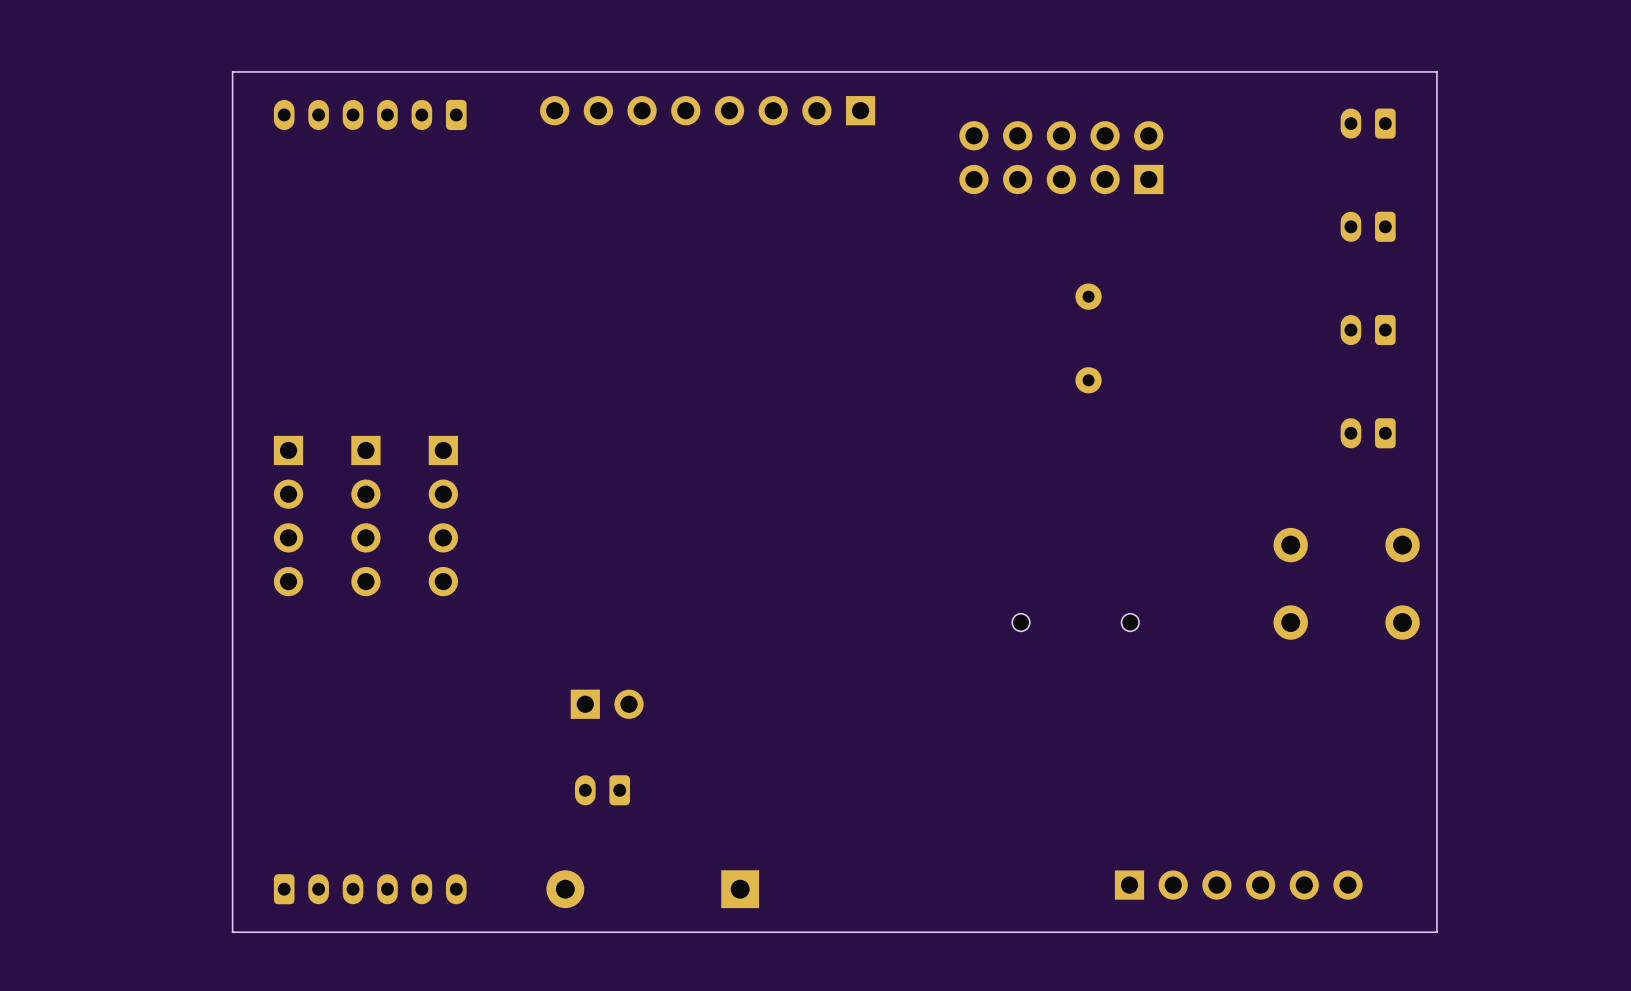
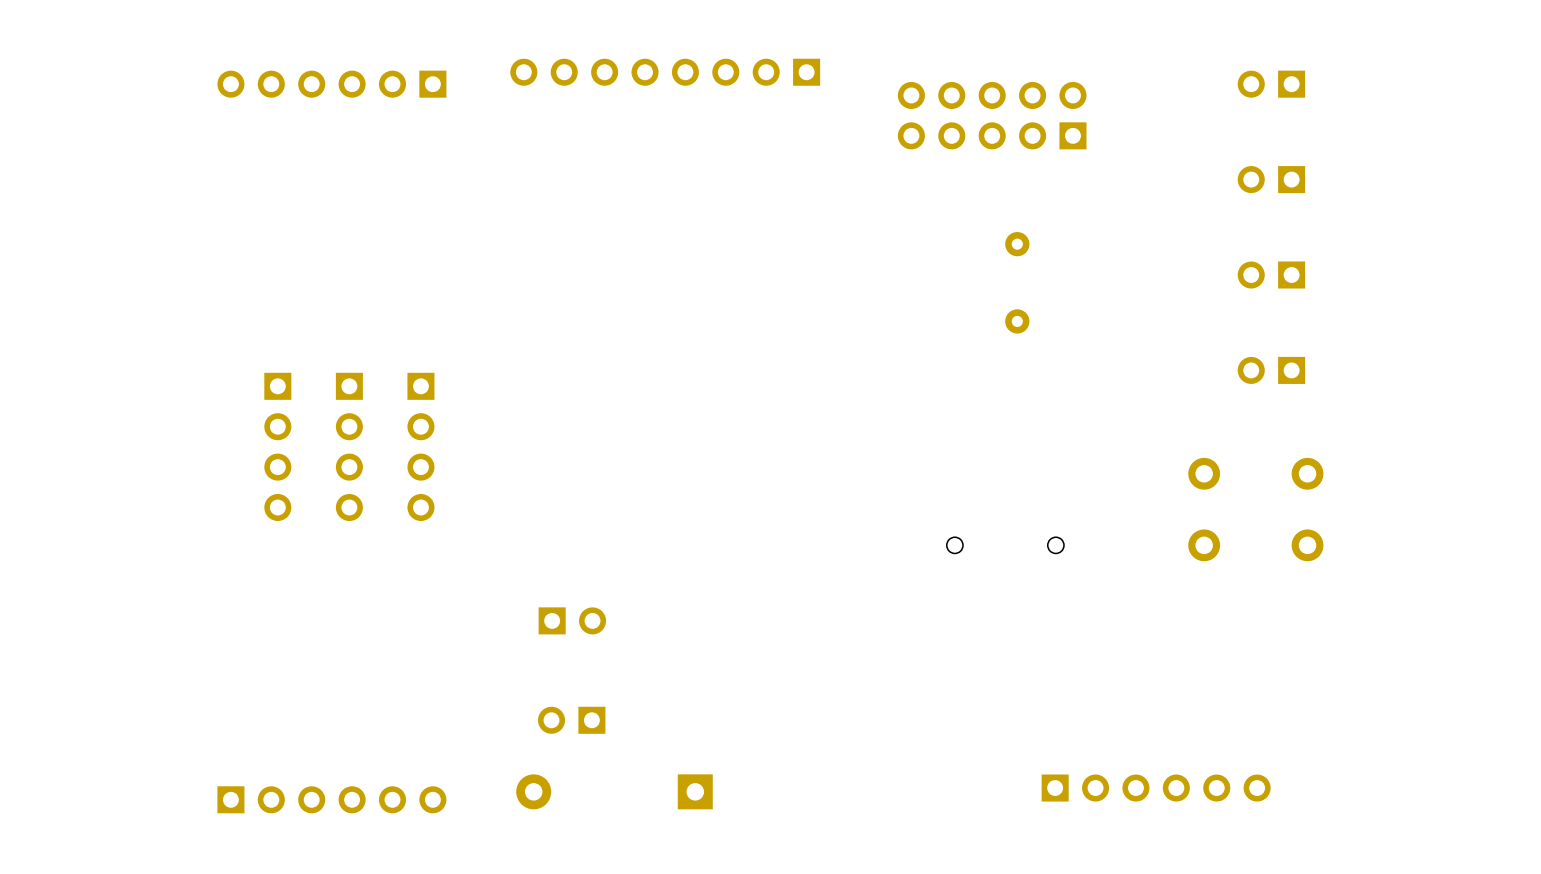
board edge: (1436, 71) (1436, 932) (232, 932) (232, 71) (1436, 71) -> none
part footprint: [1340, 108, 1396, 139] -> [1237, 70, 1306, 98]
part: (370, 114) -> none
part: none -> (331, 84)
part footprint: [1340, 211, 1396, 242] -> [1237, 166, 1306, 194]
part footprint: [1340, 314, 1396, 346] -> [1237, 261, 1306, 289]
part footprint: [1340, 418, 1396, 449] -> [1237, 356, 1306, 384]
part: (602, 790) -> none
part: none -> (571, 720)
part: (370, 889) -> none
part: none -> (331, 799)

